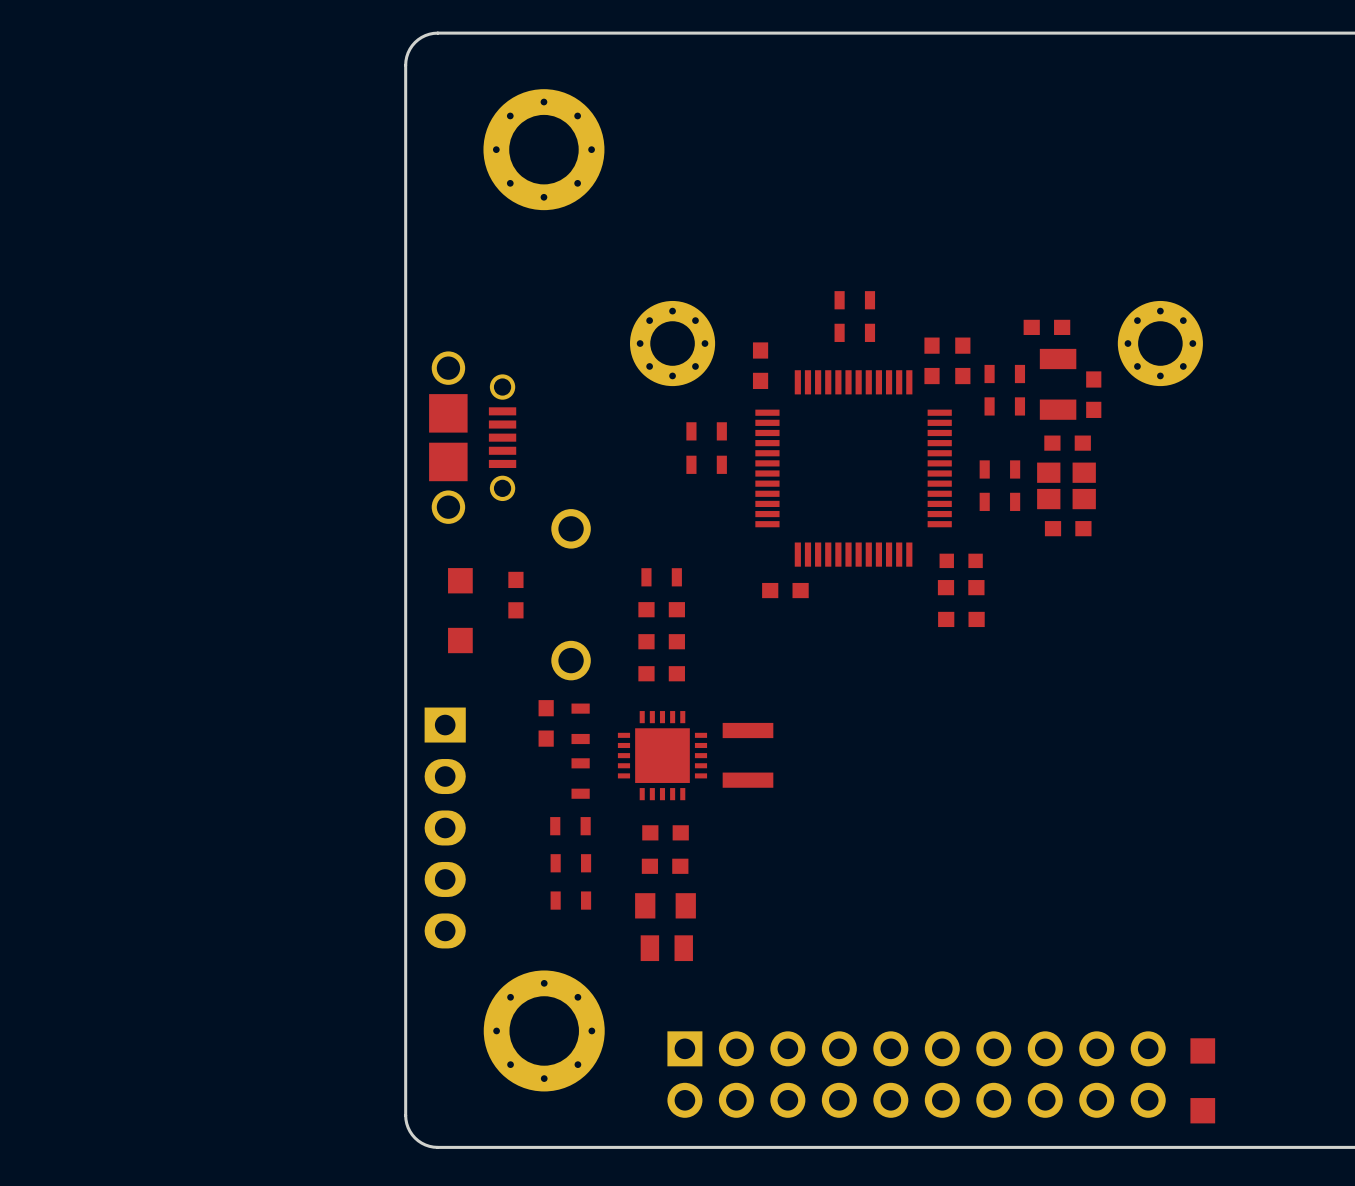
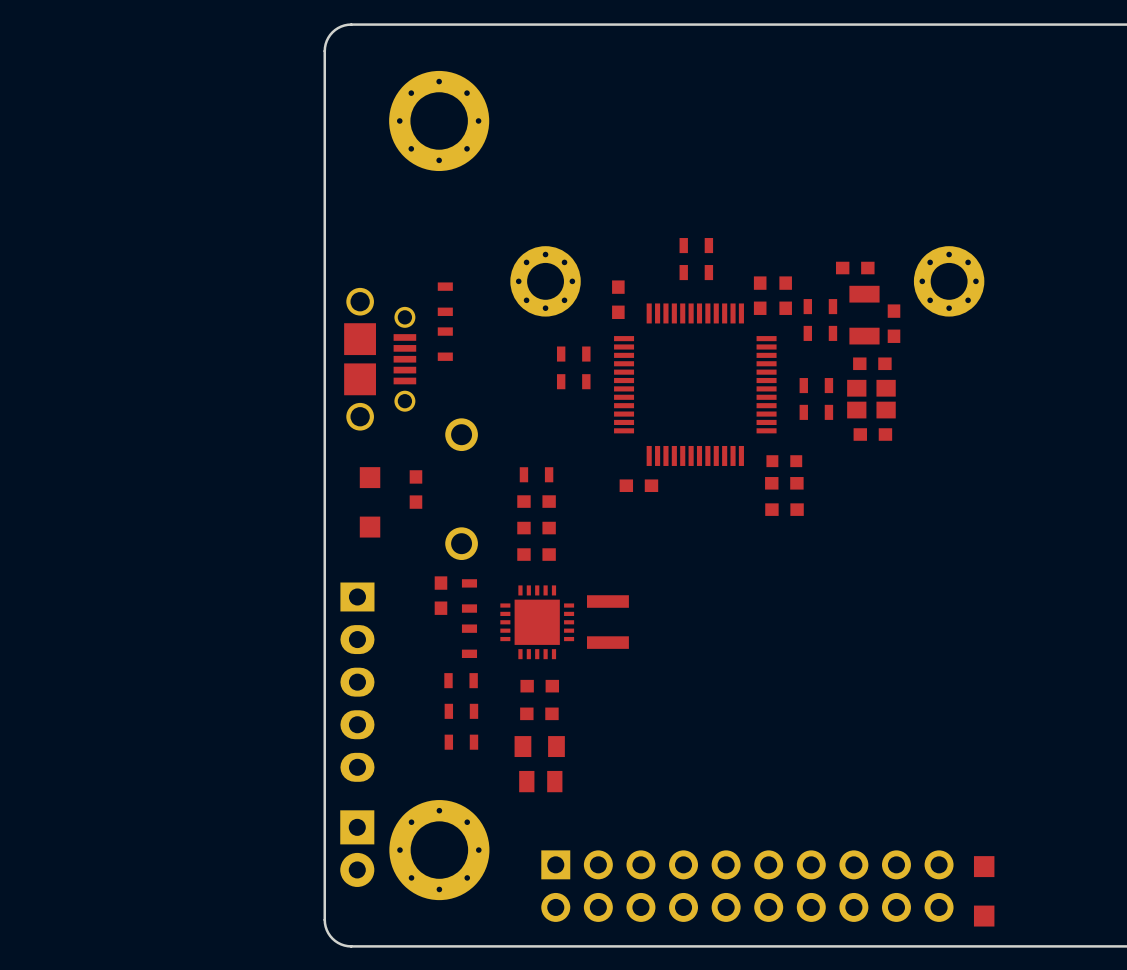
part: none -> (445, 299)
part: none -> (445, 344)
part: none -> (357, 848)

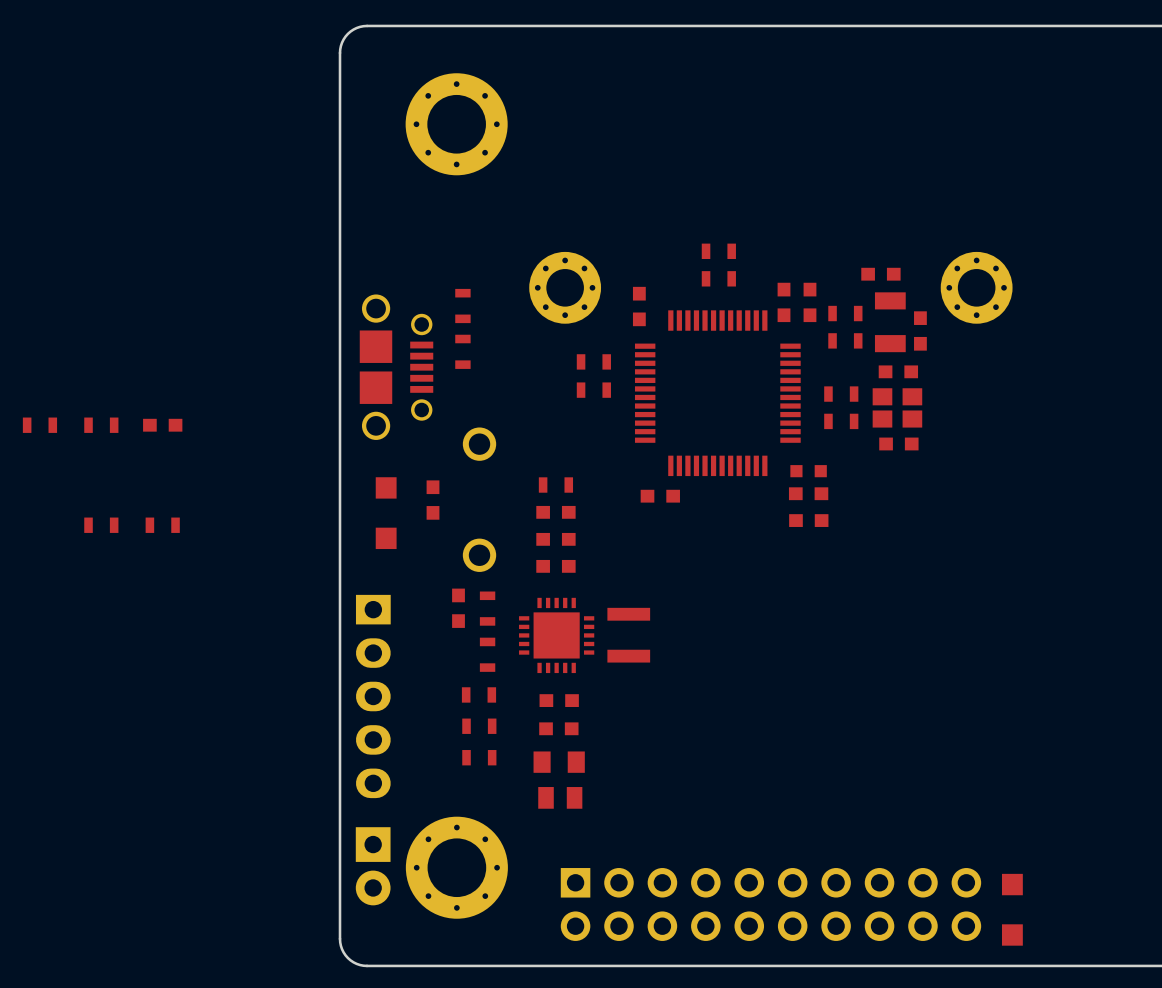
part: none -> (39, 425)
part: none -> (101, 425)
part: none -> (162, 425)
part: none -> (101, 525)
part: none -> (162, 525)

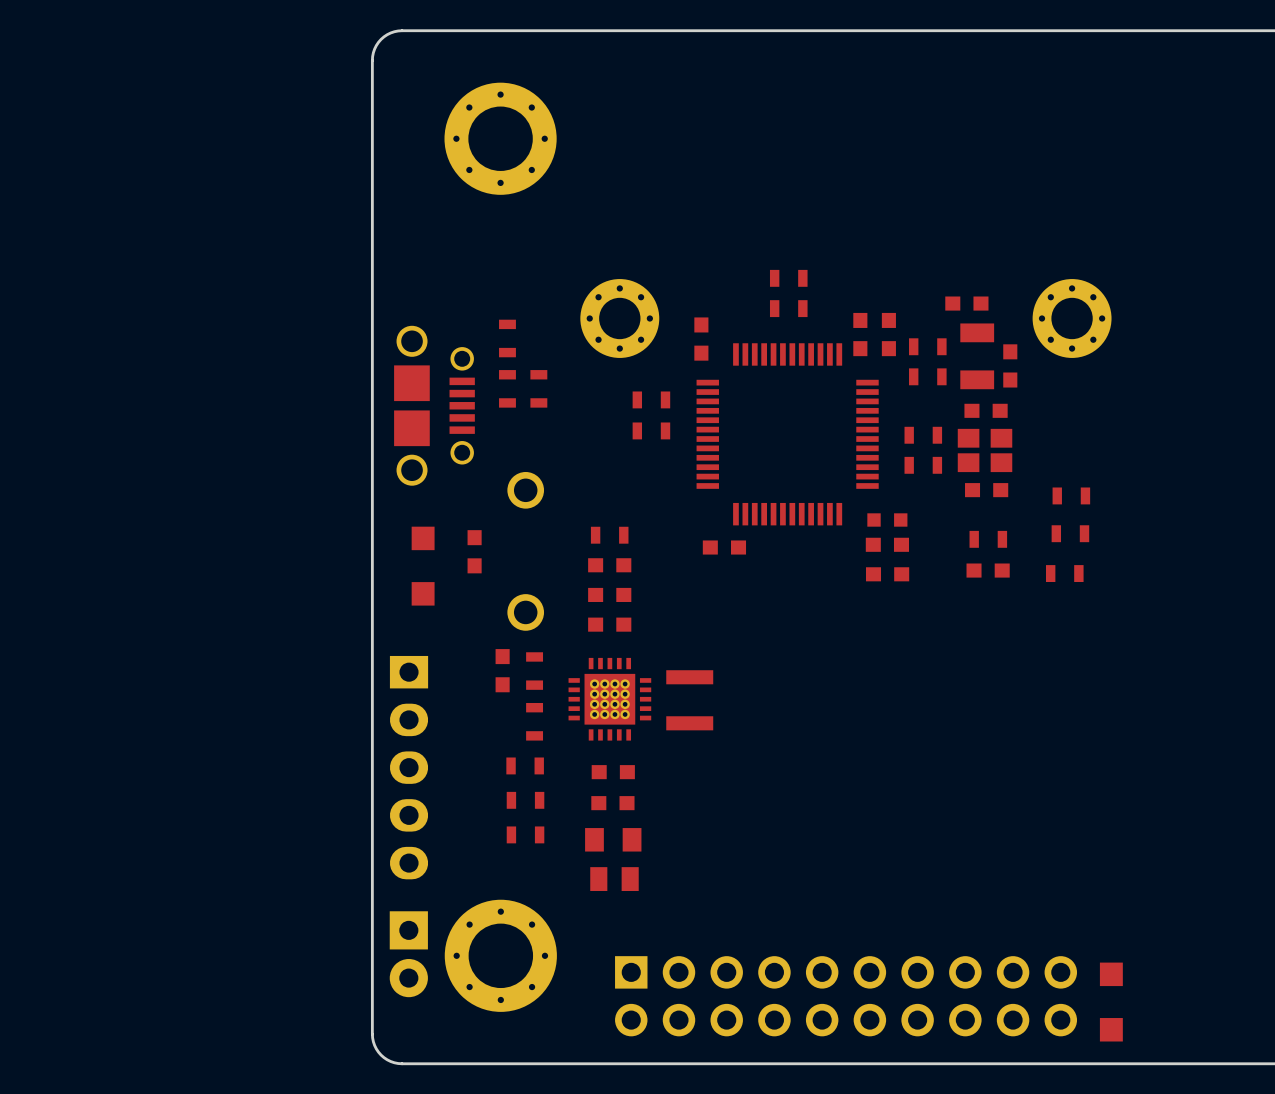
part: none -> (538, 388)
part: (39, 425) -> none
part: (101, 425) -> none
part: (162, 425) -> none
part: none -> (1071, 495)
part: none -> (1070, 533)
part: none -> (988, 539)
part: none -> (988, 570)
part: none -> (1064, 573)
part: (101, 525) -> none
part: (162, 525) -> none
part footprint: [519, 597, 595, 674] -> [568, 657, 652, 741]

